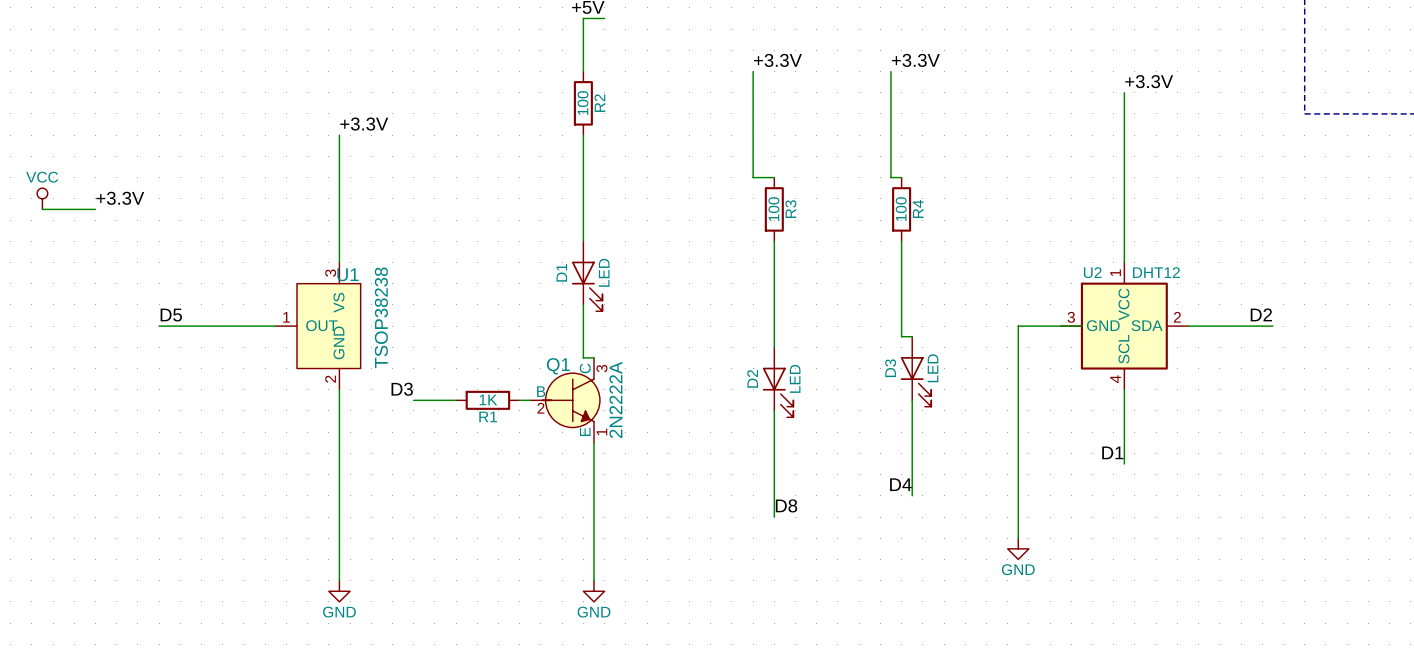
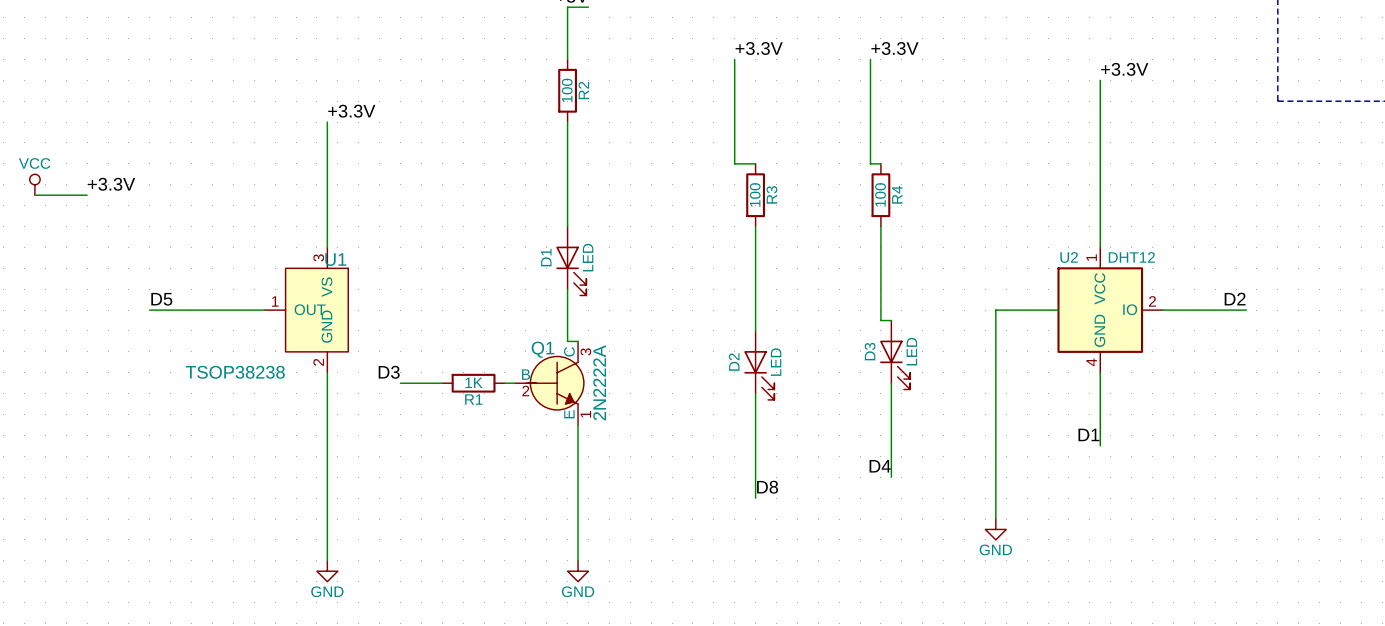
U2 symbol: [1060, 262, 1189, 390] -> [1057, 247, 1163, 373]
U1 value rotation: 0° (381, 317) -> 90° clockwise (235, 372)
U1 value position: TSOP38238 (381, 317) -> TSOP38238 (235, 372)

